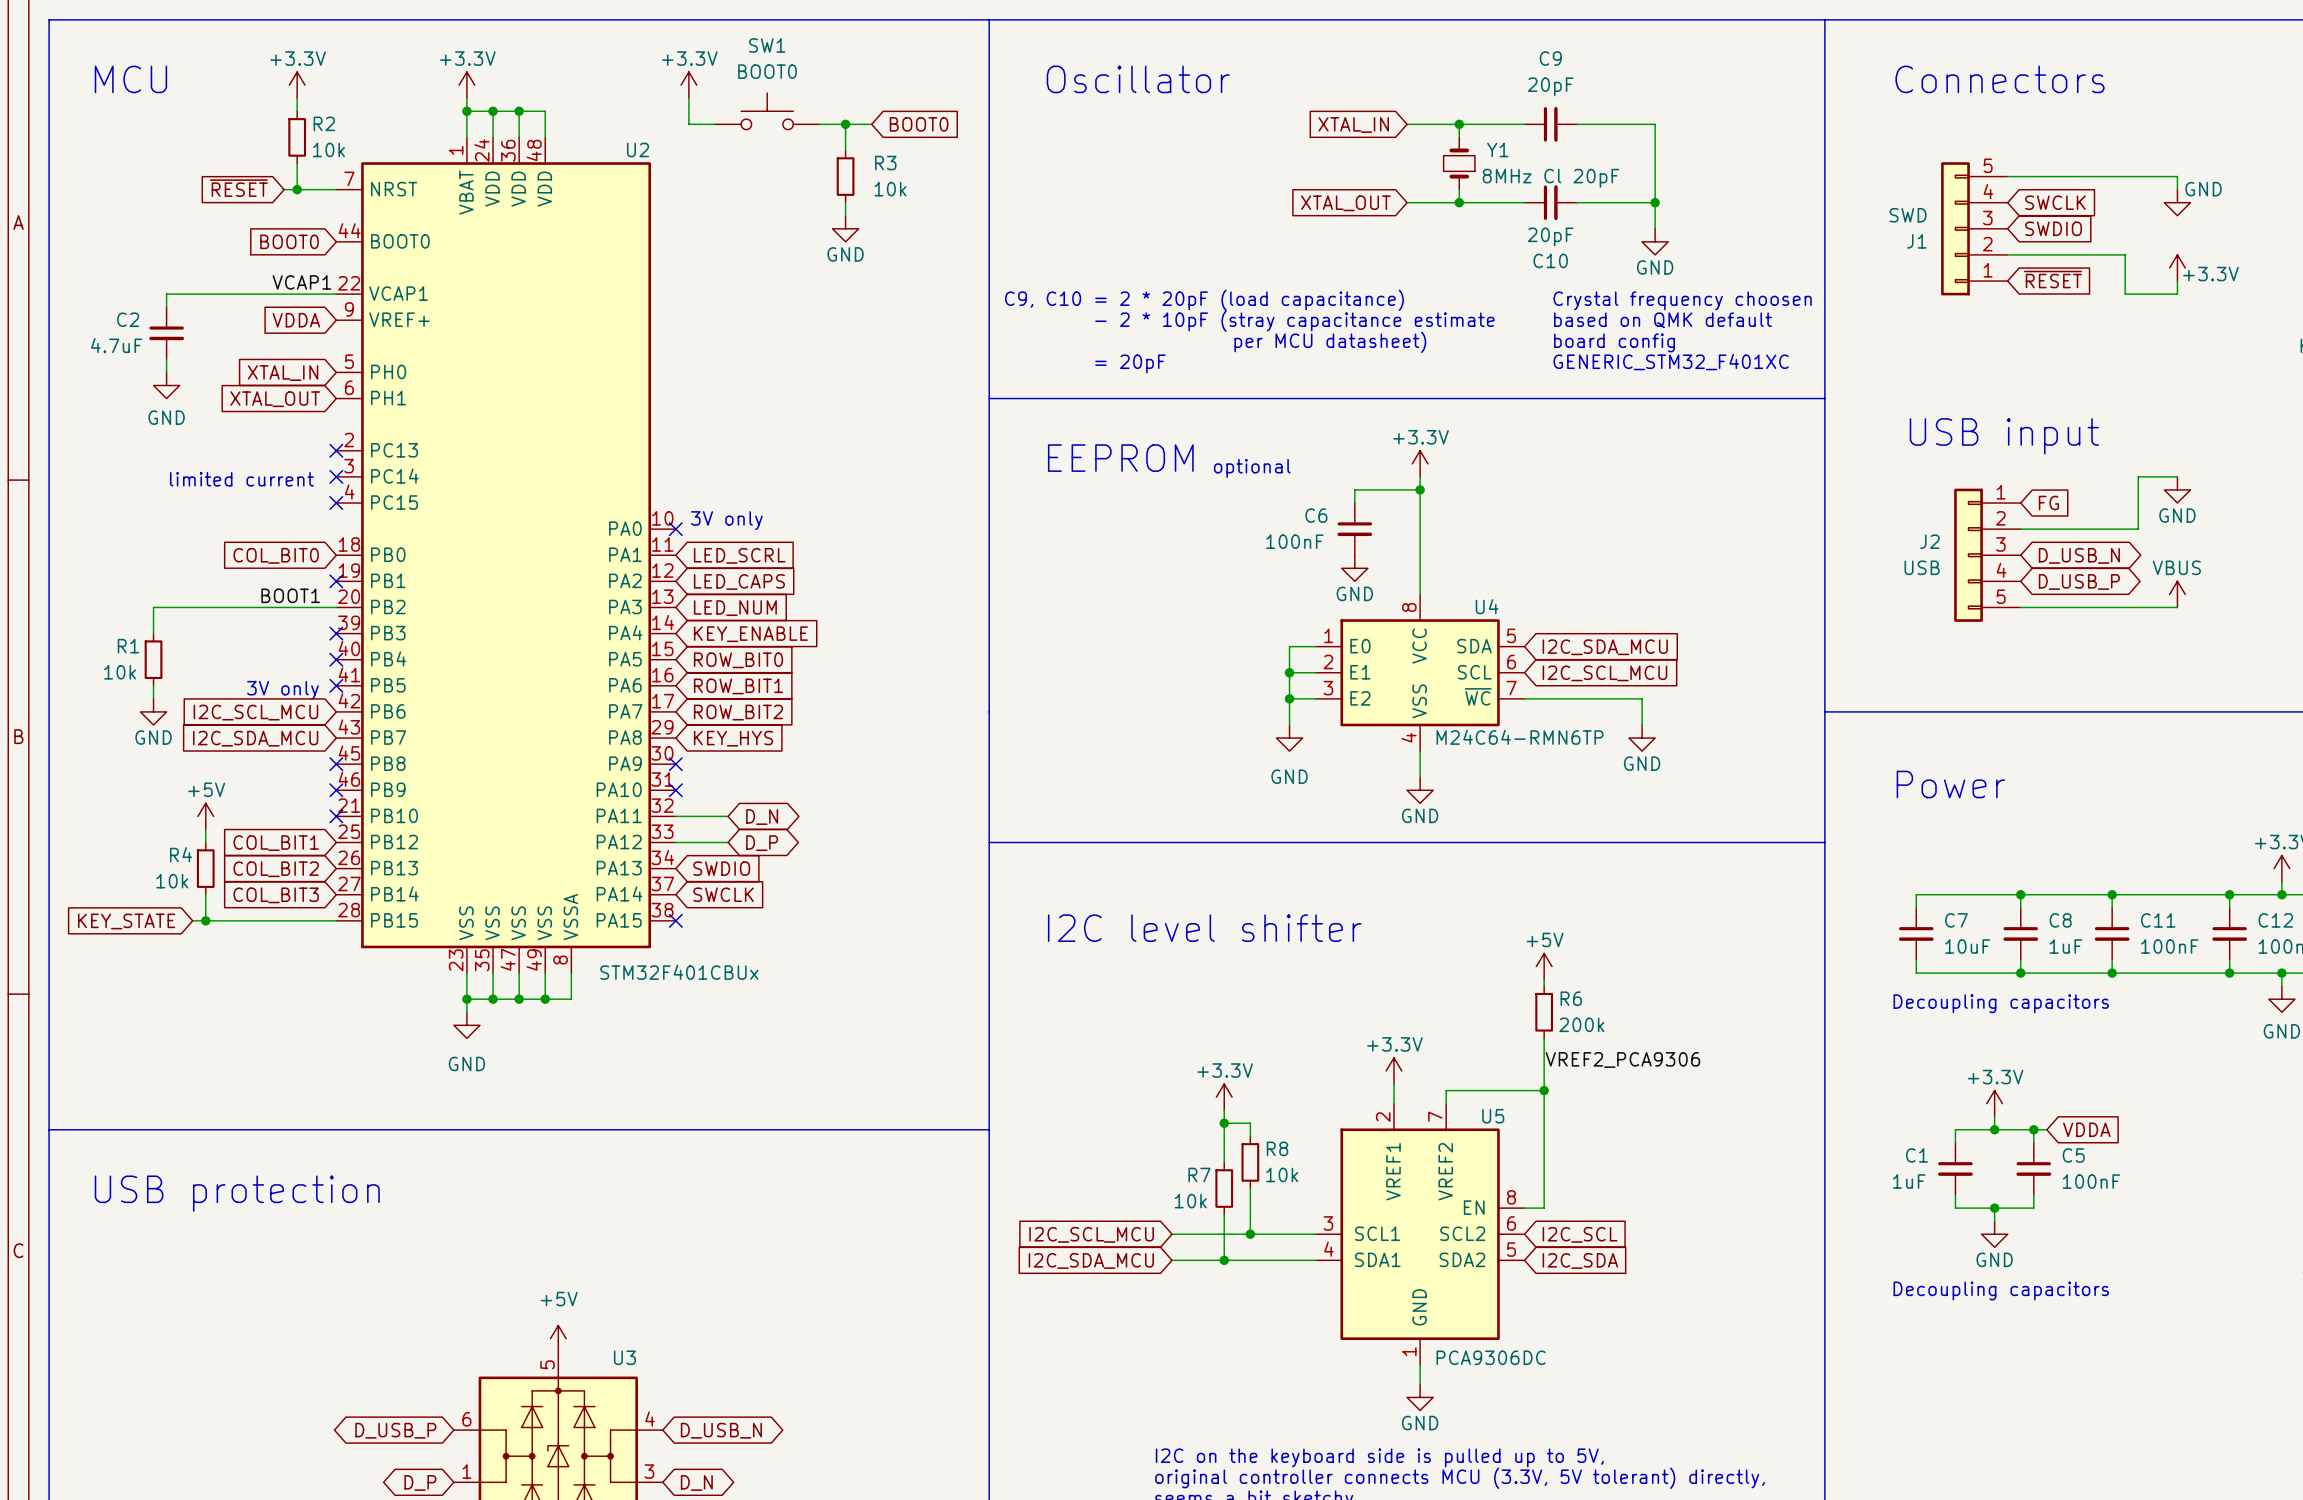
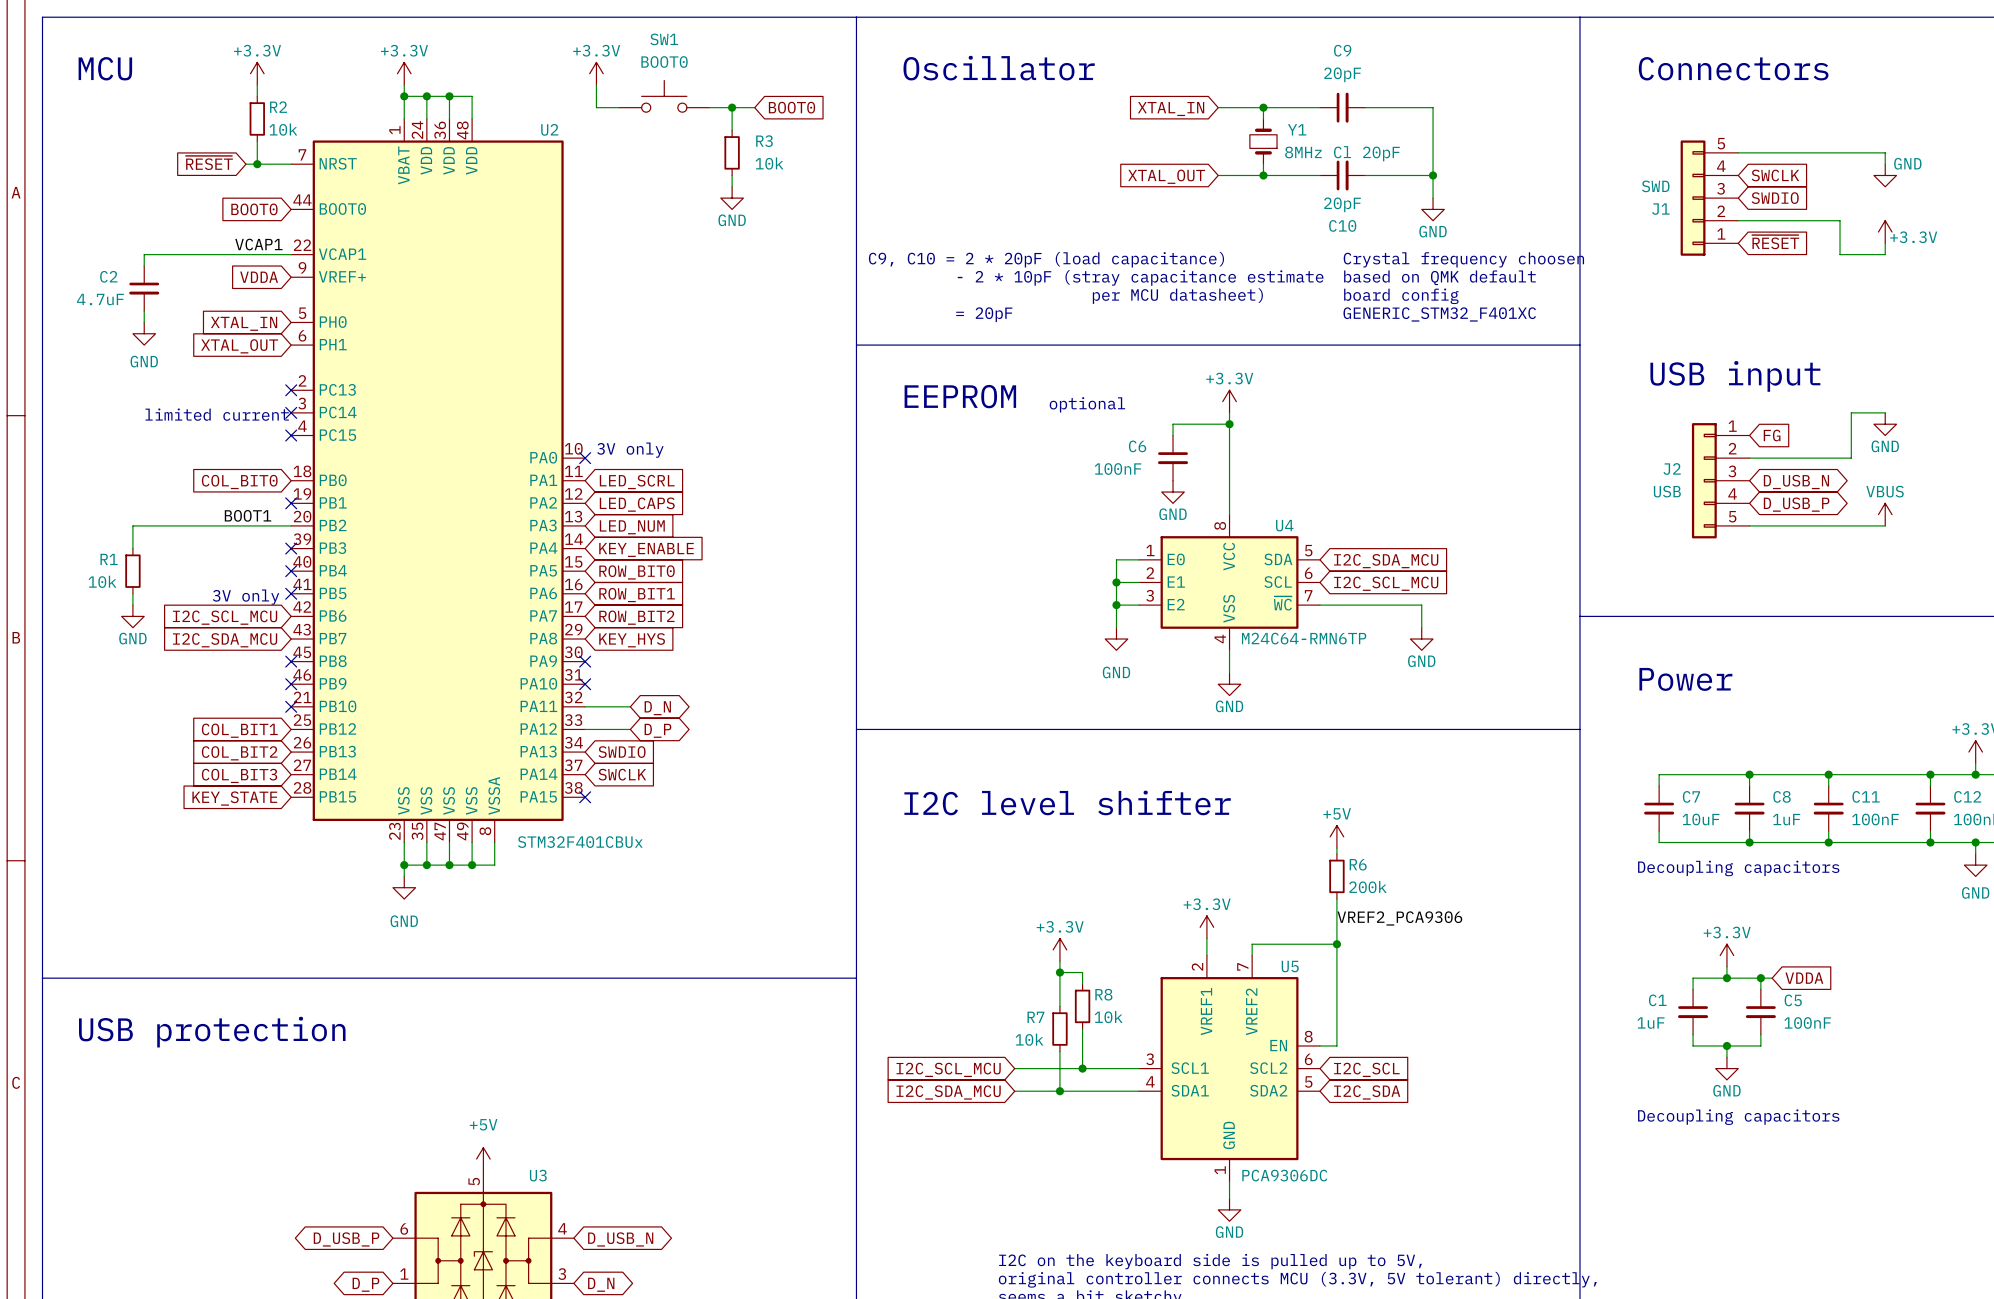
power symbol: +5V (205, 816) -> none
wire: (205, 829) (205, 842) -> none
R4: 10k (205, 868) -> none
wire: (205, 894) (205, 920) -> none
wire: (192, 920) (336, 920) -> none
junction: (205, 920) -> none
global label position: KEY_STATE (126, 921) -> KEY_STATE (234, 798)

